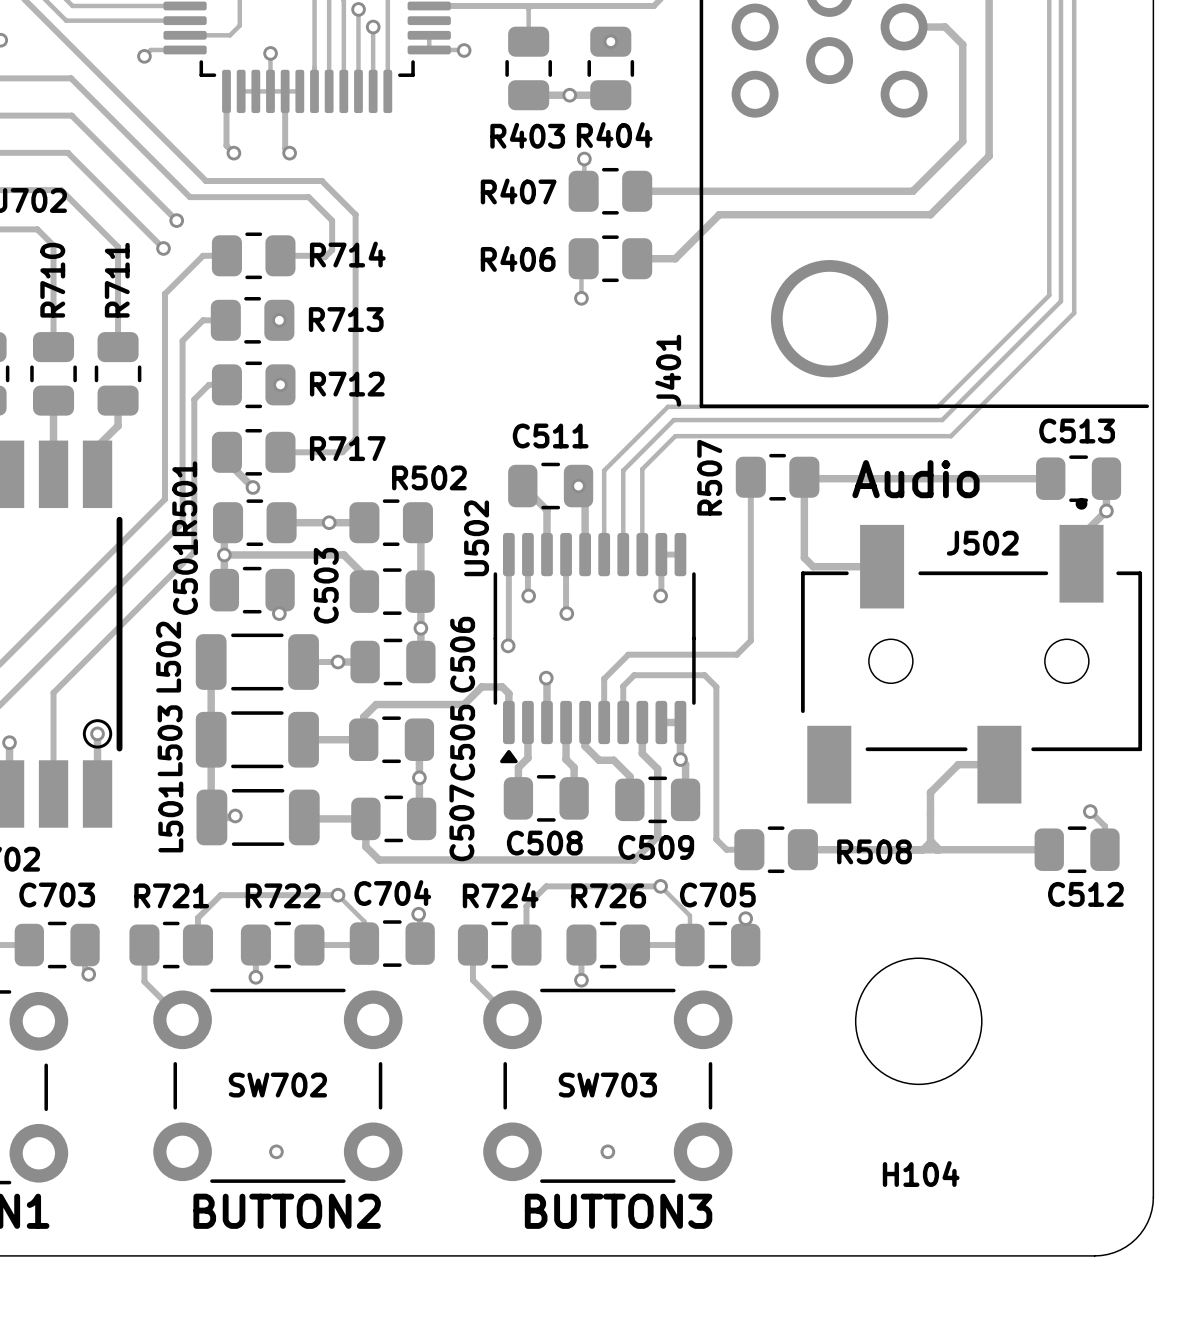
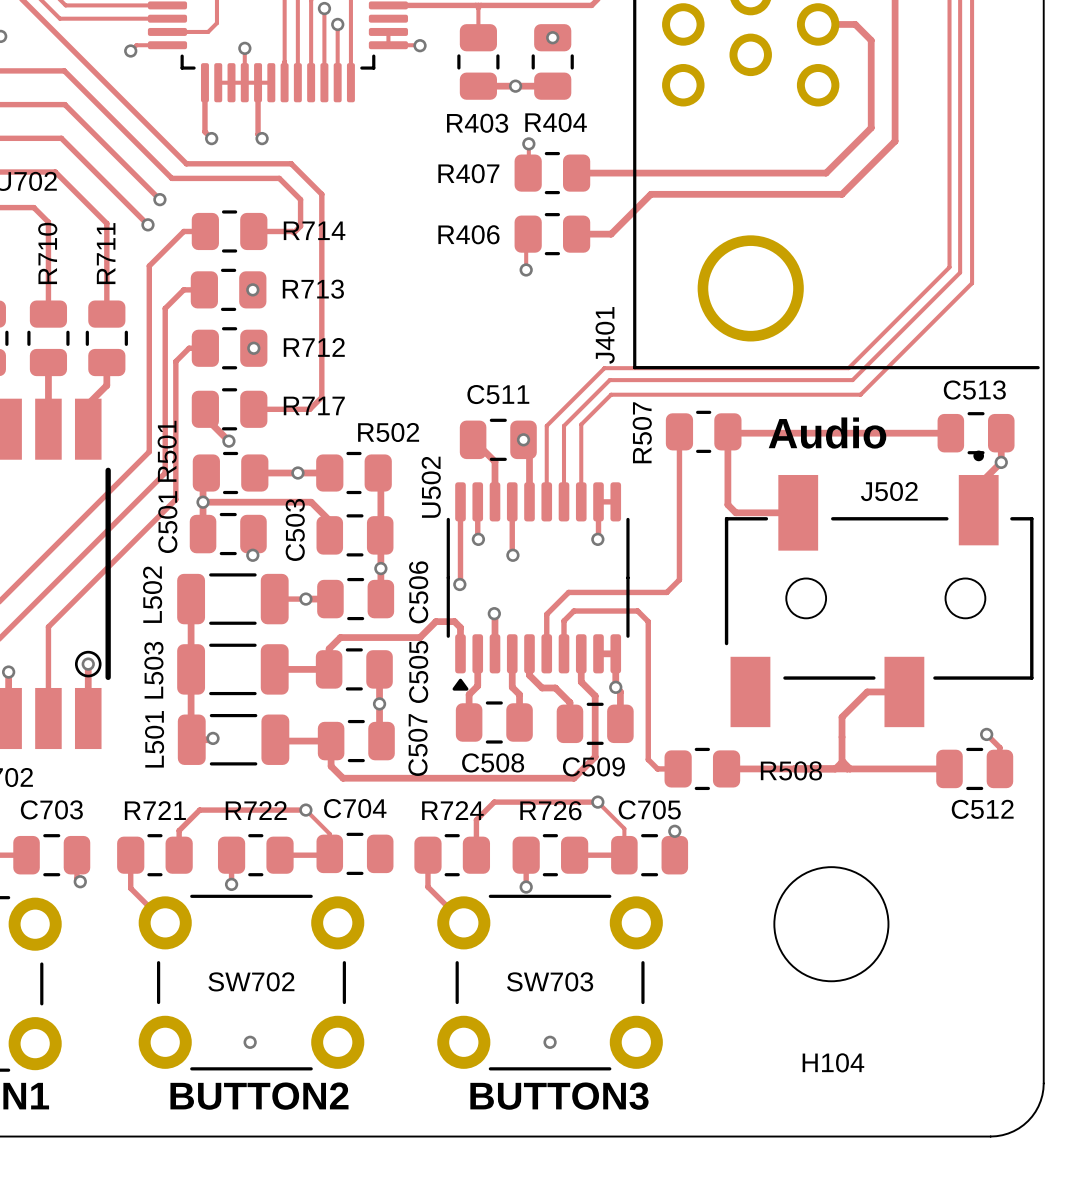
via: (418, 914) -> none

